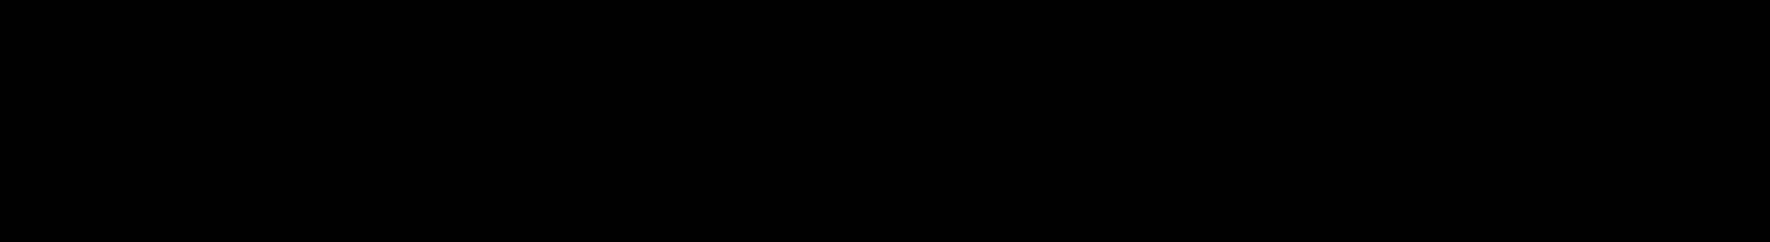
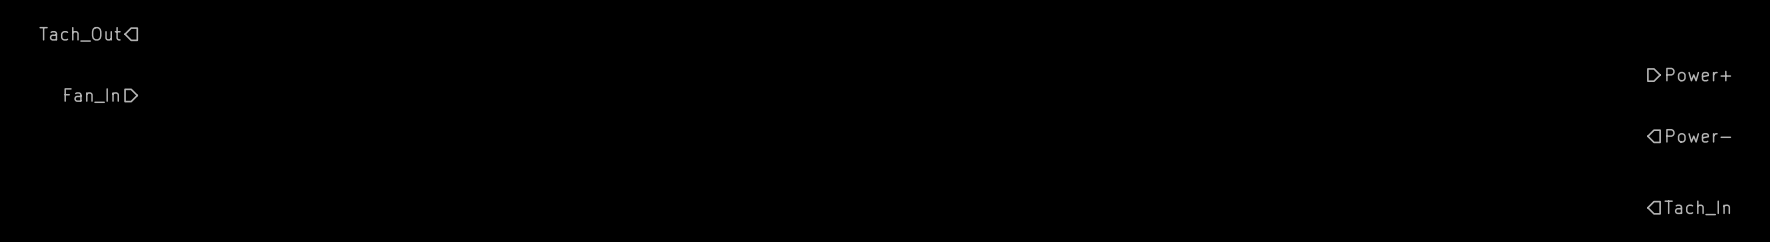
hierarchical label: none -> Tach_Out (80, 34)
hierarchical label: none -> Power+ (1698, 74)
hierarchical label: none -> Fan_In (91, 95)
hierarchical label: none -> Power- (1698, 135)
hierarchical label: none -> Tach_In (1697, 207)

